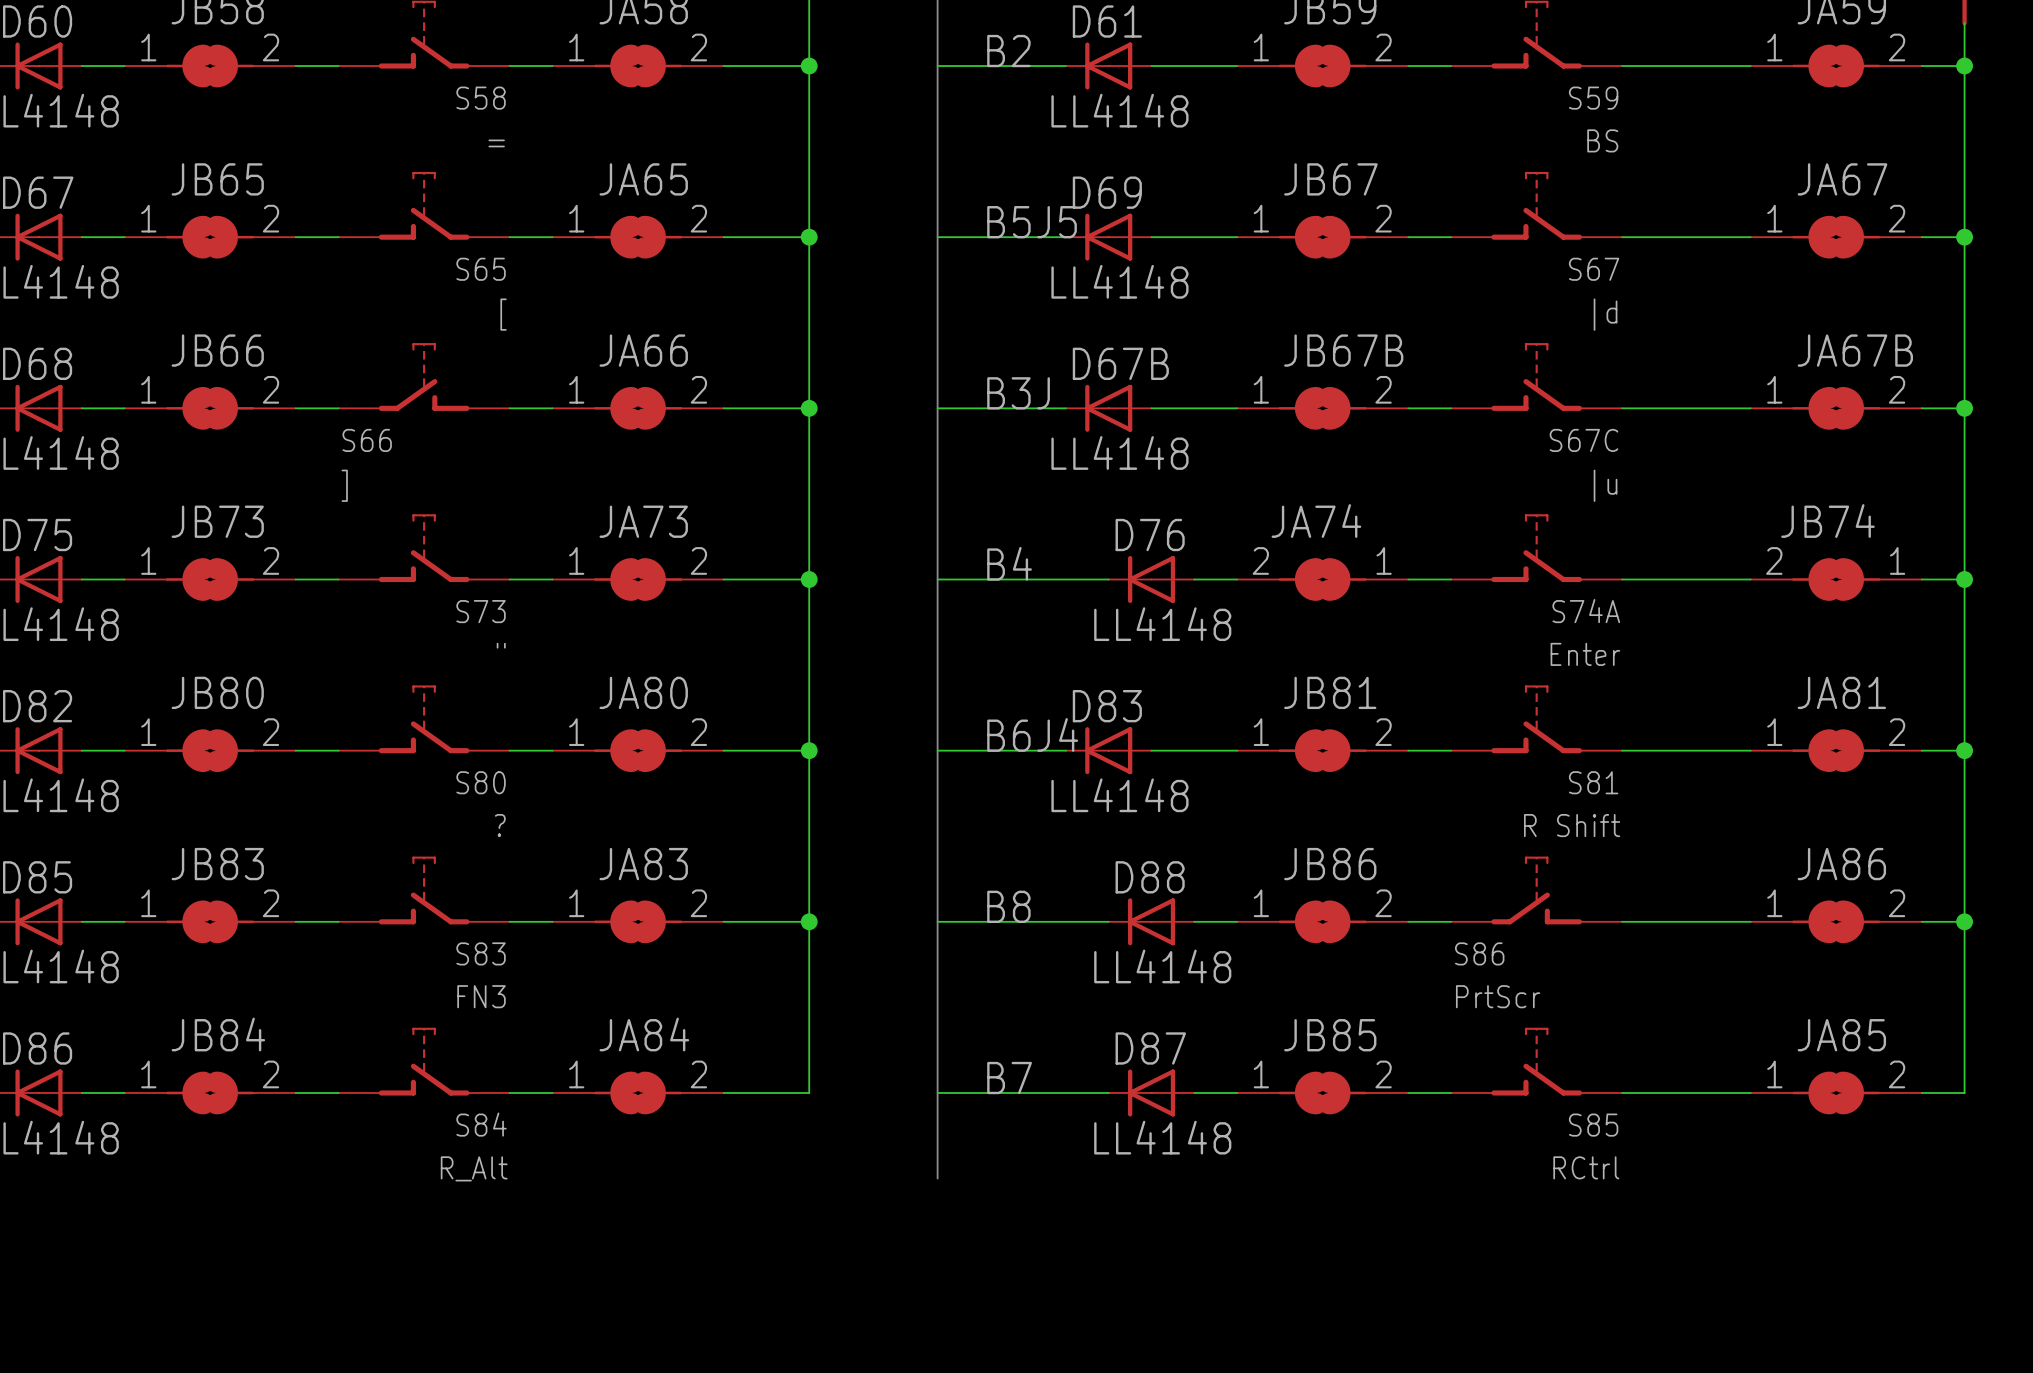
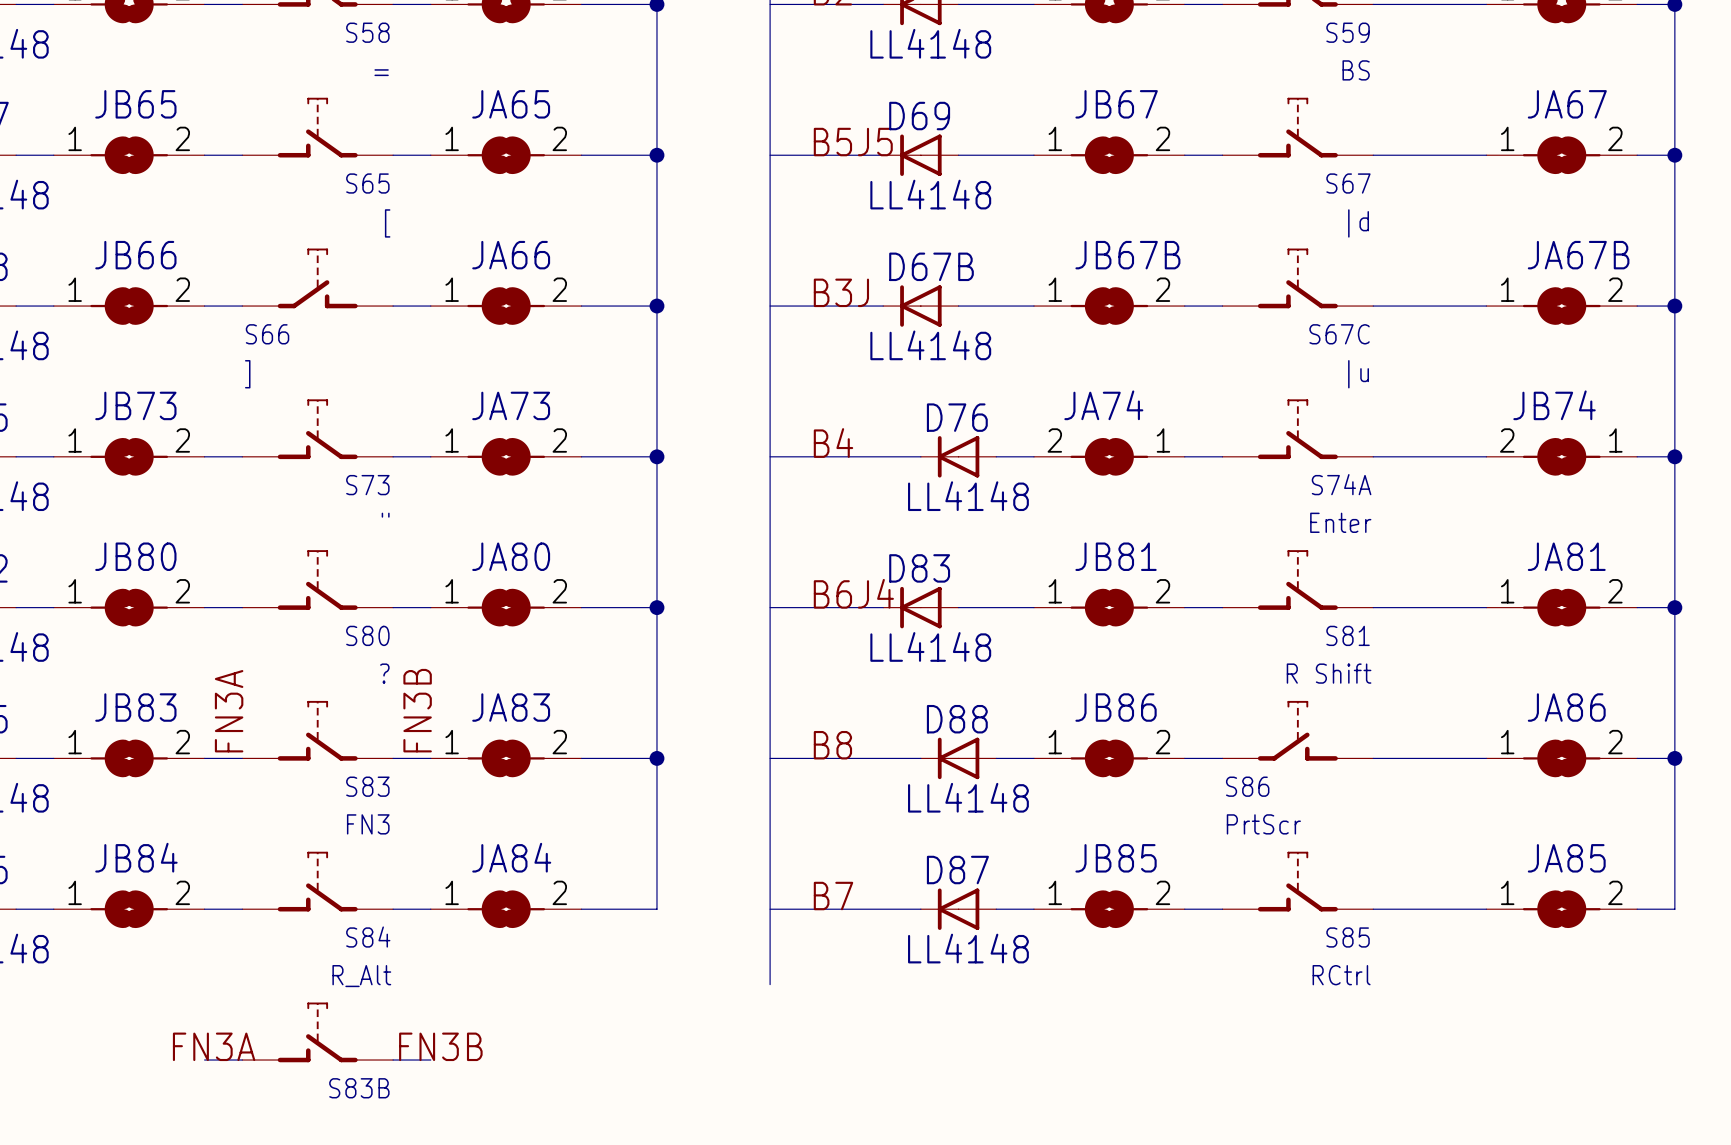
label: none -> FN3B (417, 710)
label: none -> FN3A (229, 711)
S83B: none -> (317, 1032)
label: none -> FN3A (214, 1046)
label: none -> FN3B (440, 1046)
wire: none -> (204, 1060) (242, 1060)
wire: none -> (393, 1060) (430, 1060)

